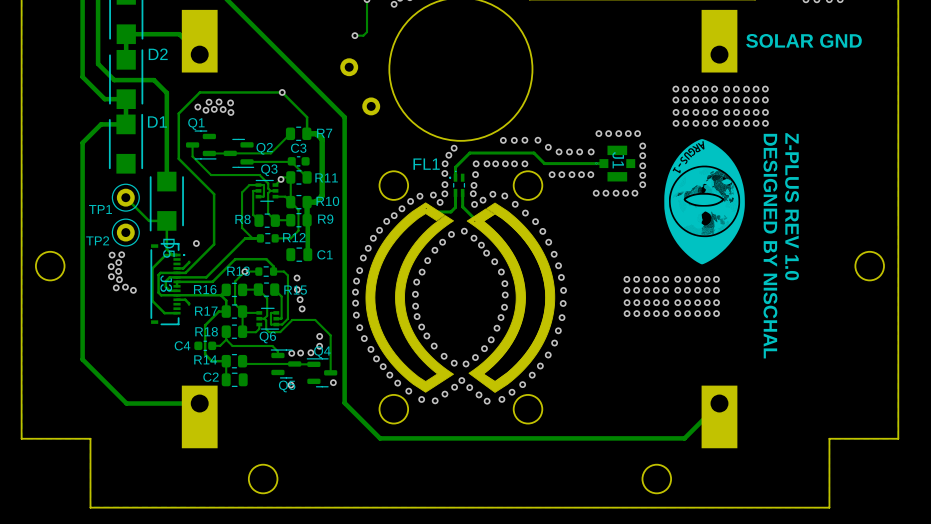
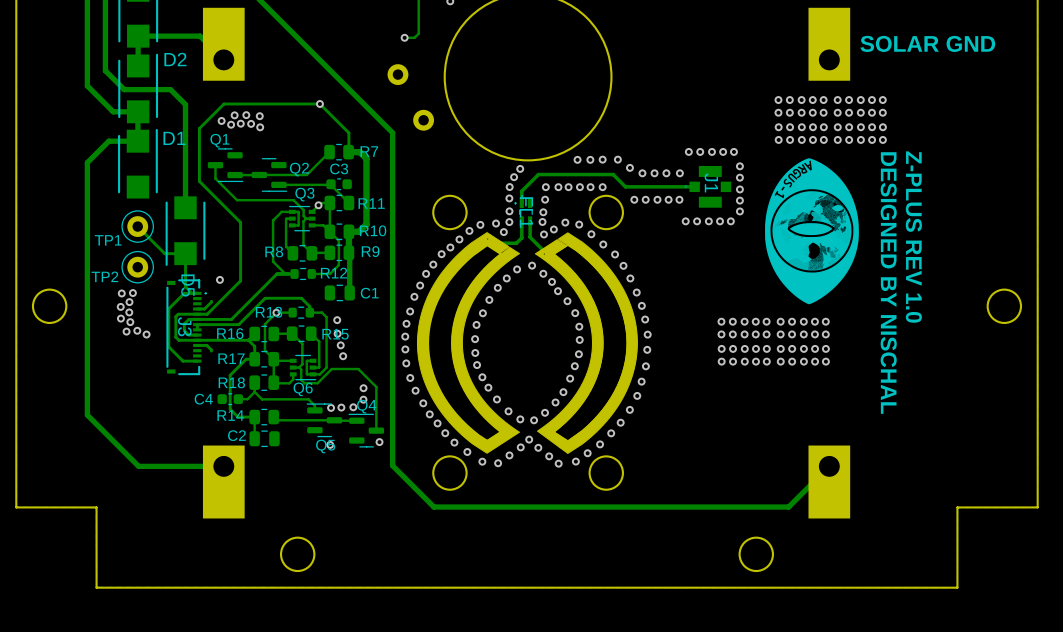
FL1 name rotation: 0° (426, 164) -> 90° clockwise (526, 212)
FL1 name position: FL1 (426, 164) -> FL1 (526, 212)
part footprint: [365, 202, 556, 393] -> [416, 232, 638, 454]

